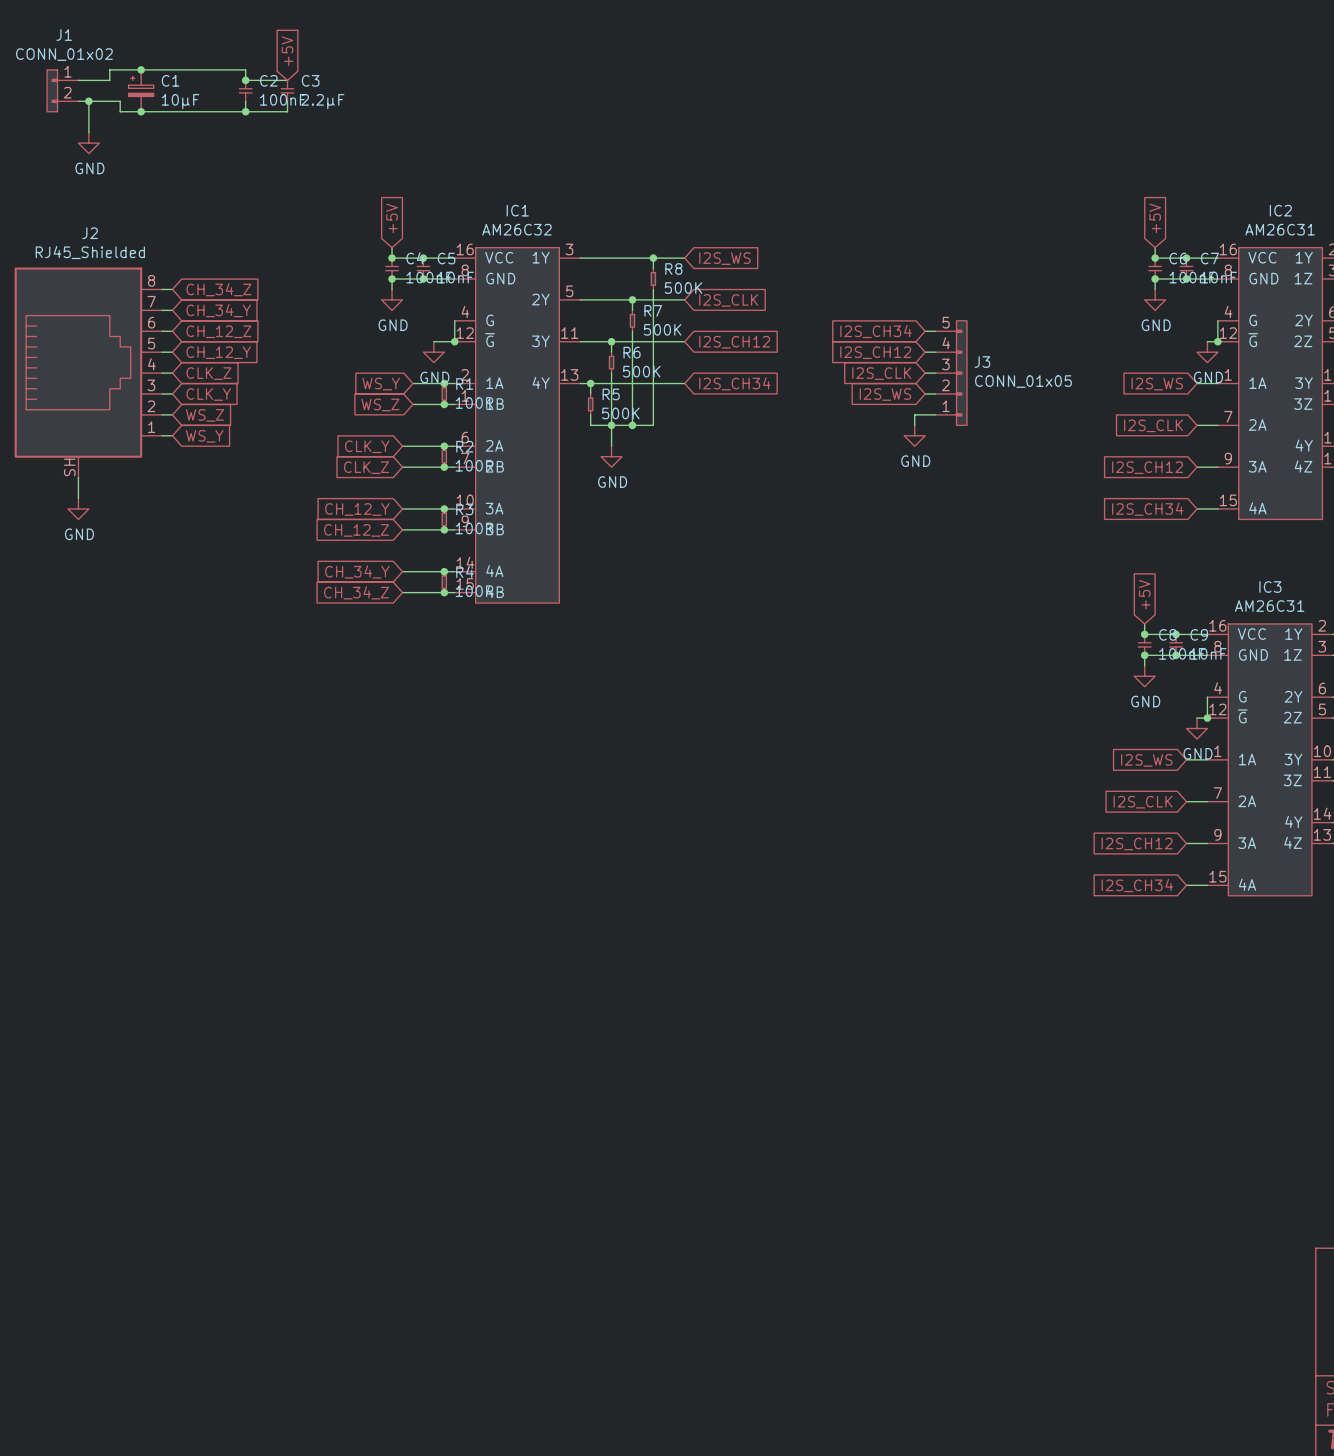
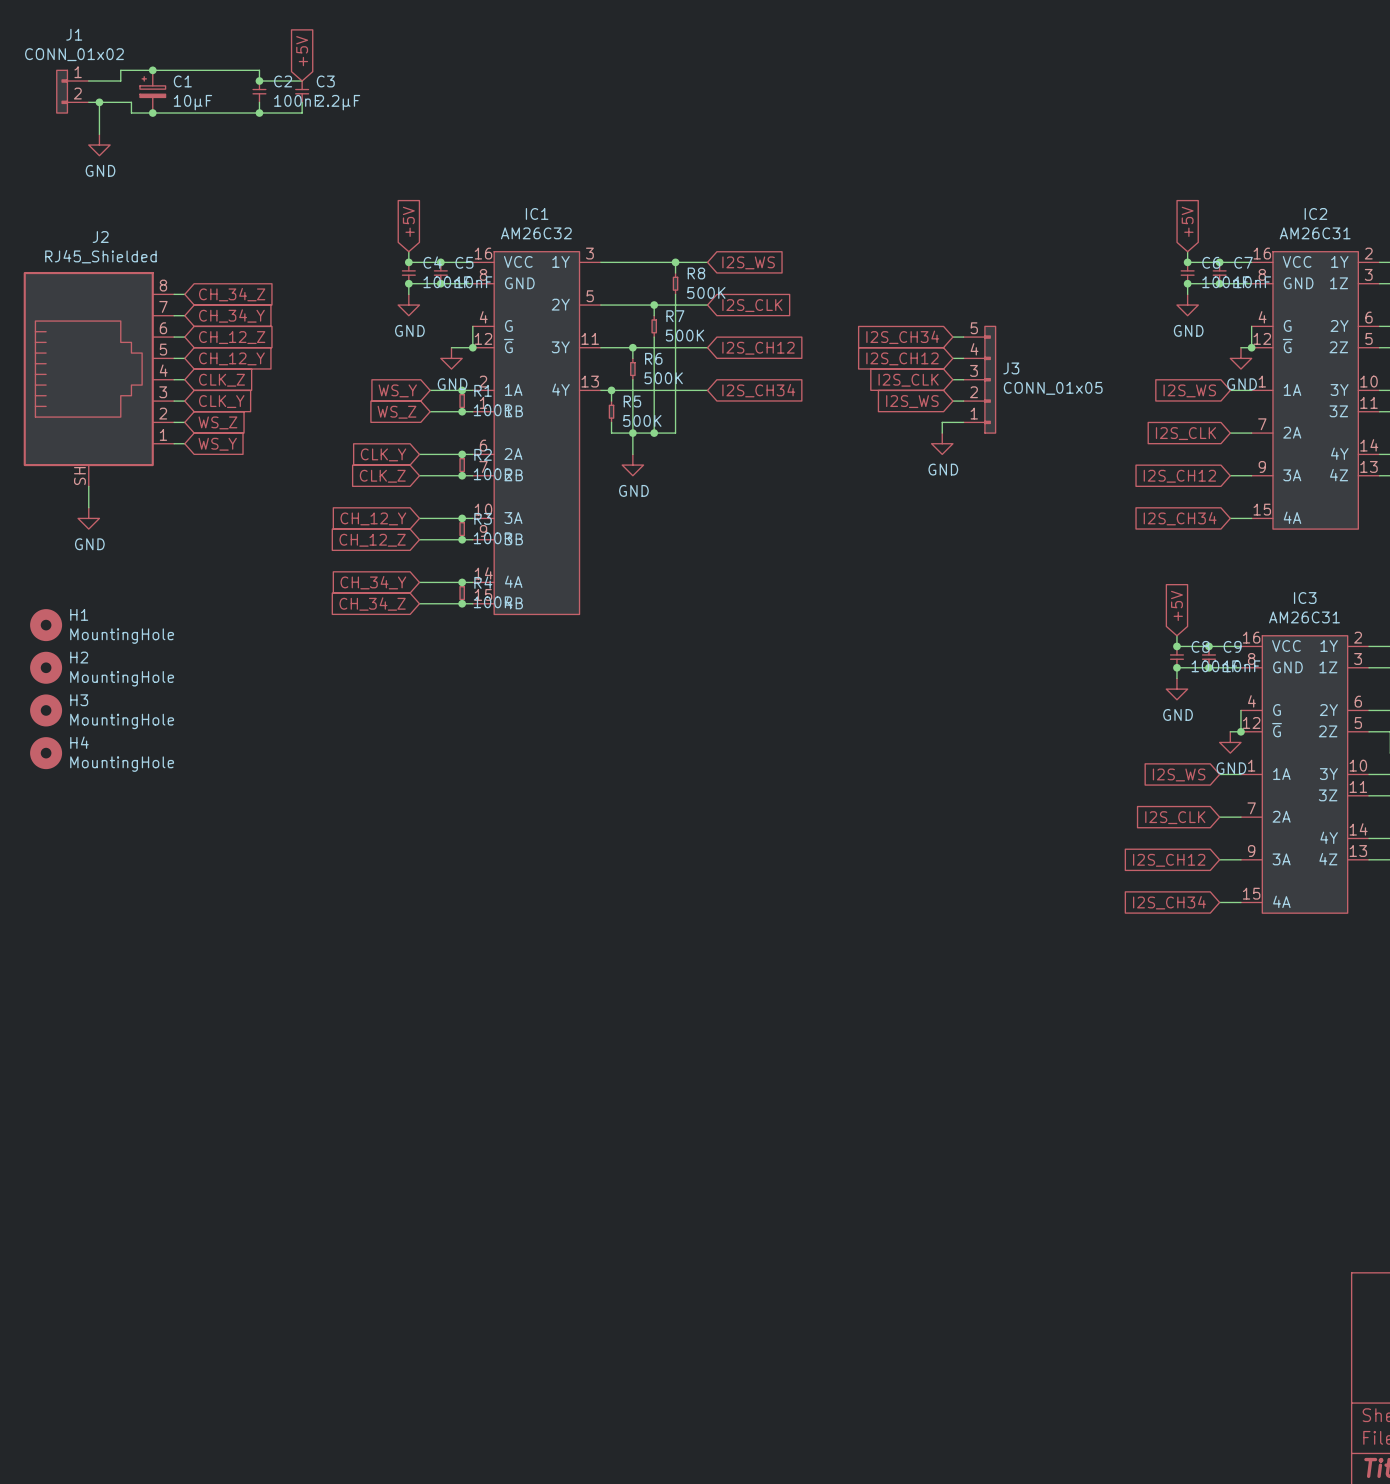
H1: none -> MountingHole (46, 625)
H2: none -> MountingHole (46, 667)
H3: none -> MountingHole (46, 710)
H4: none -> MountingHole (46, 753)

